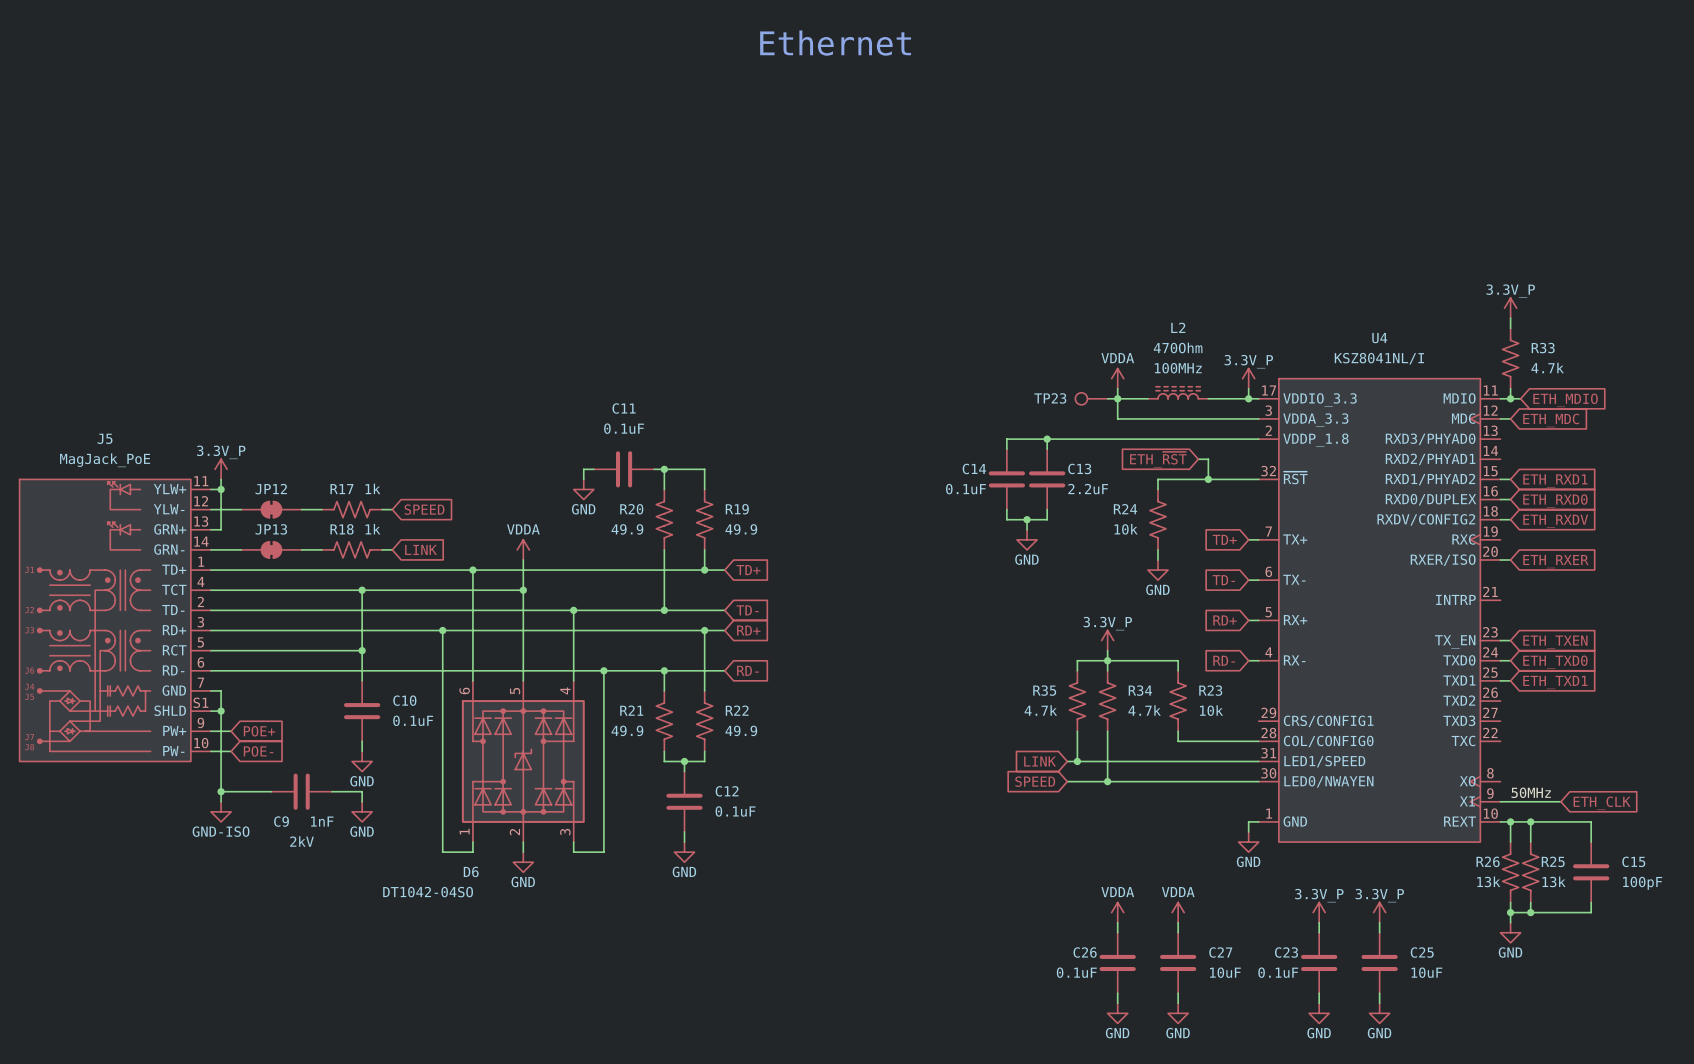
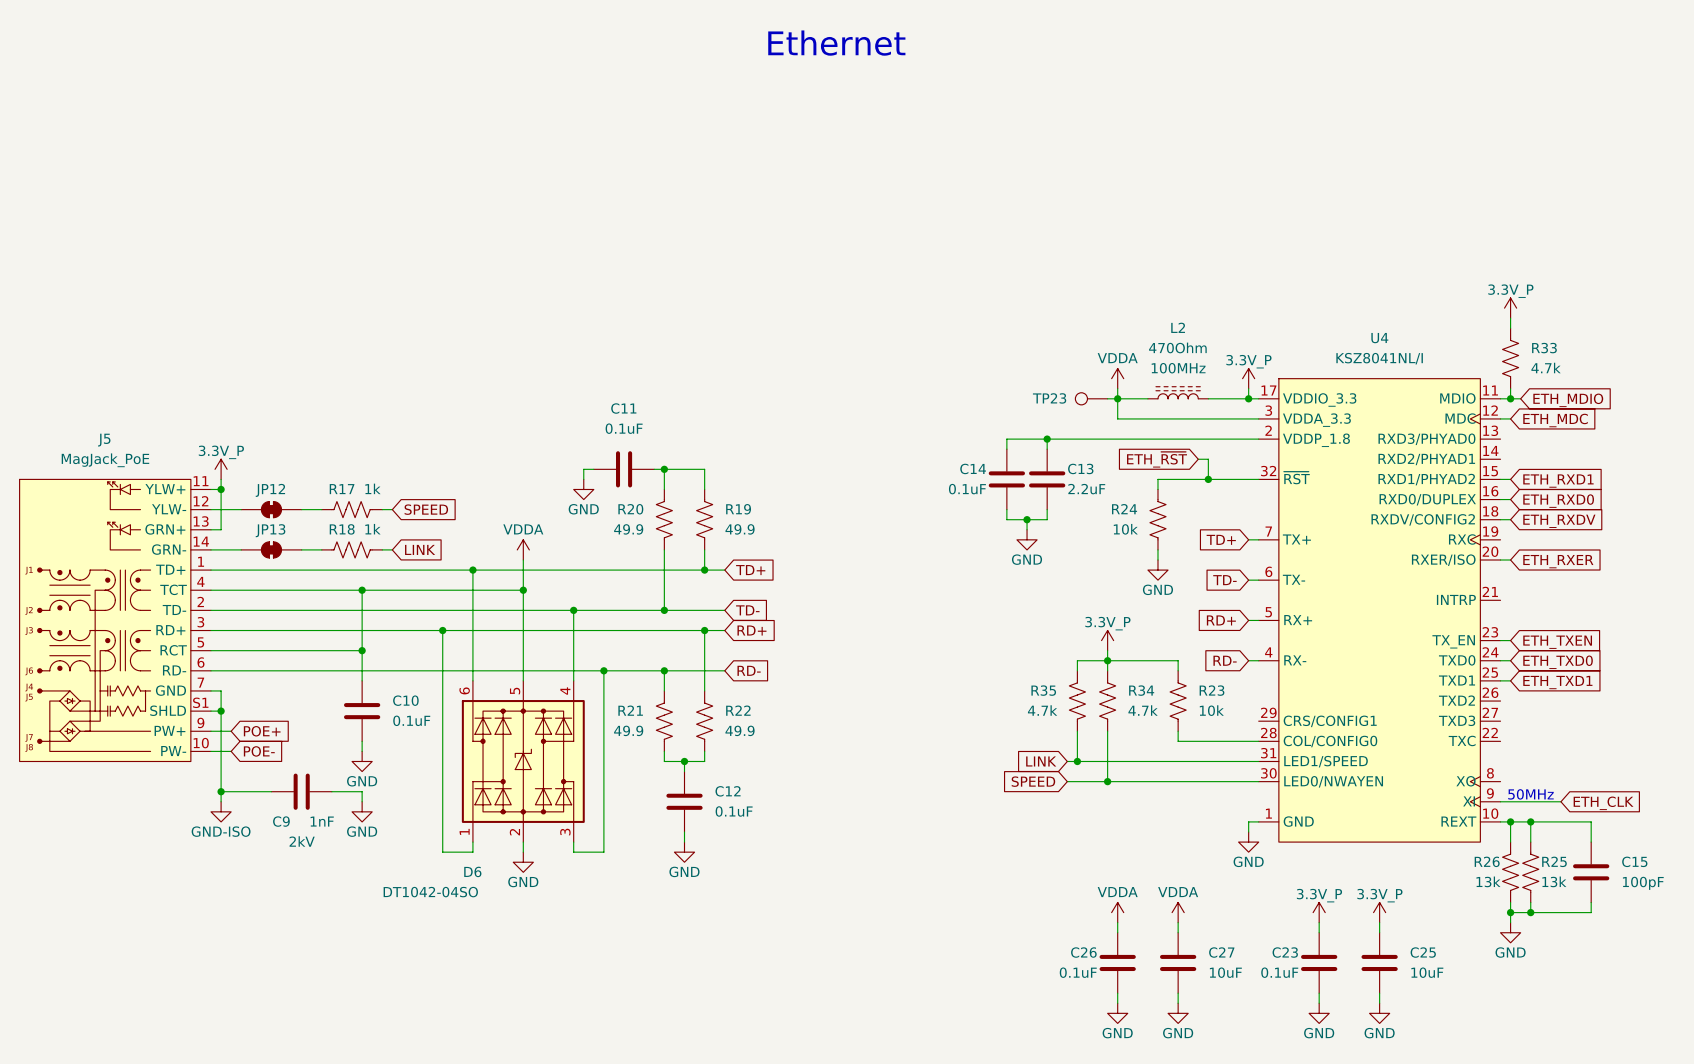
label: 50MHz (1531, 792) -> none
text: none -> 50MHz (1530, 794)

